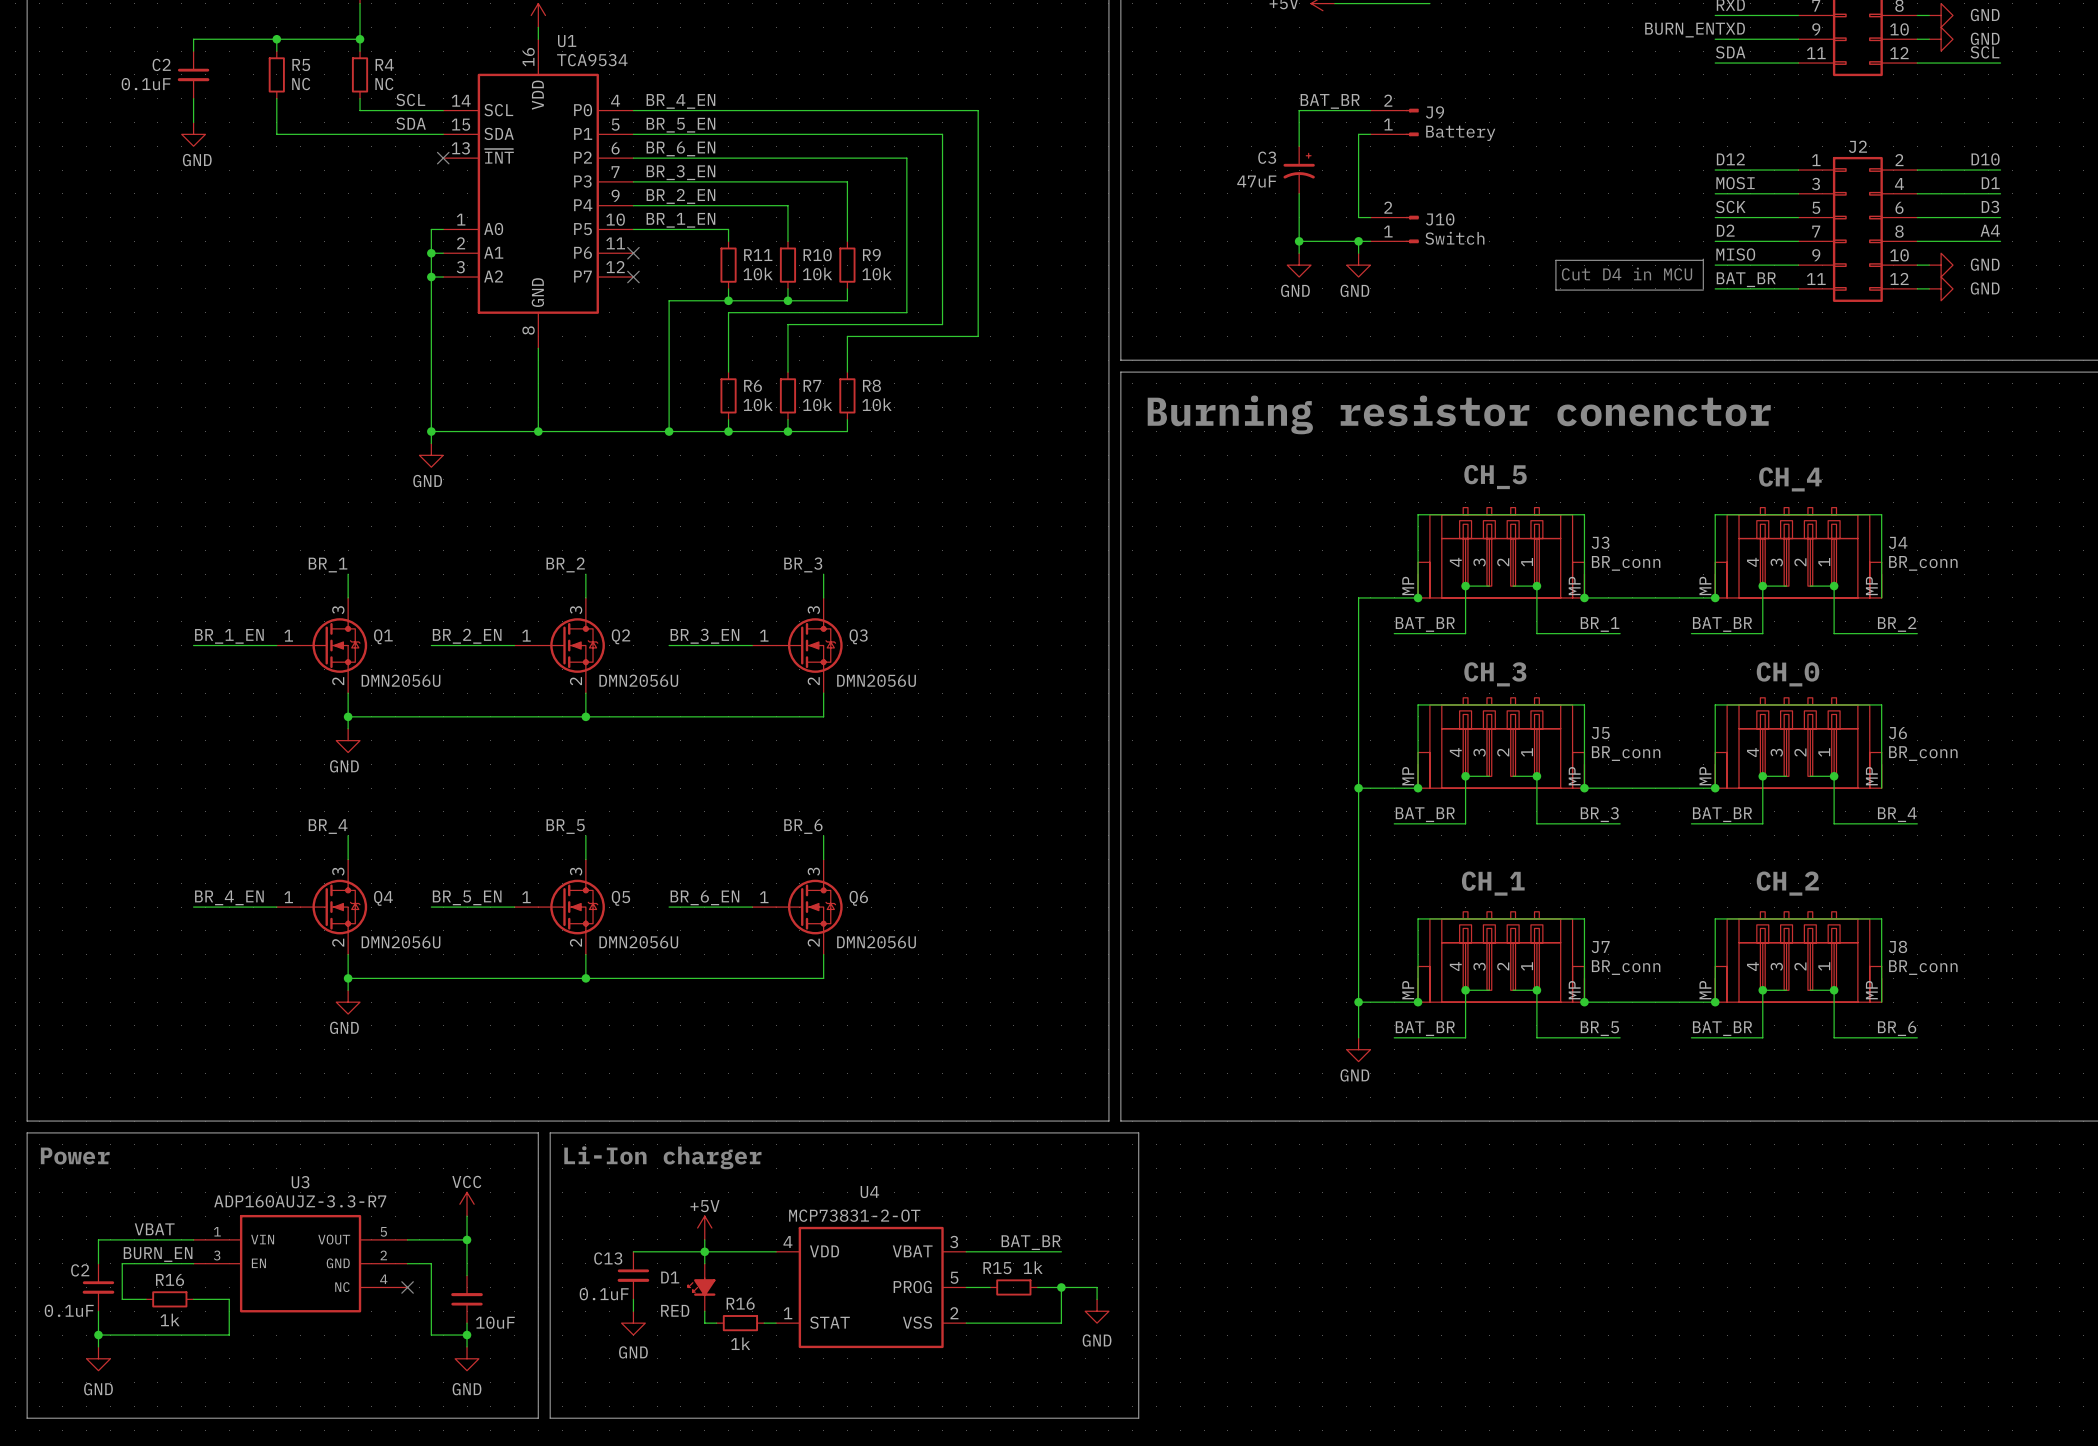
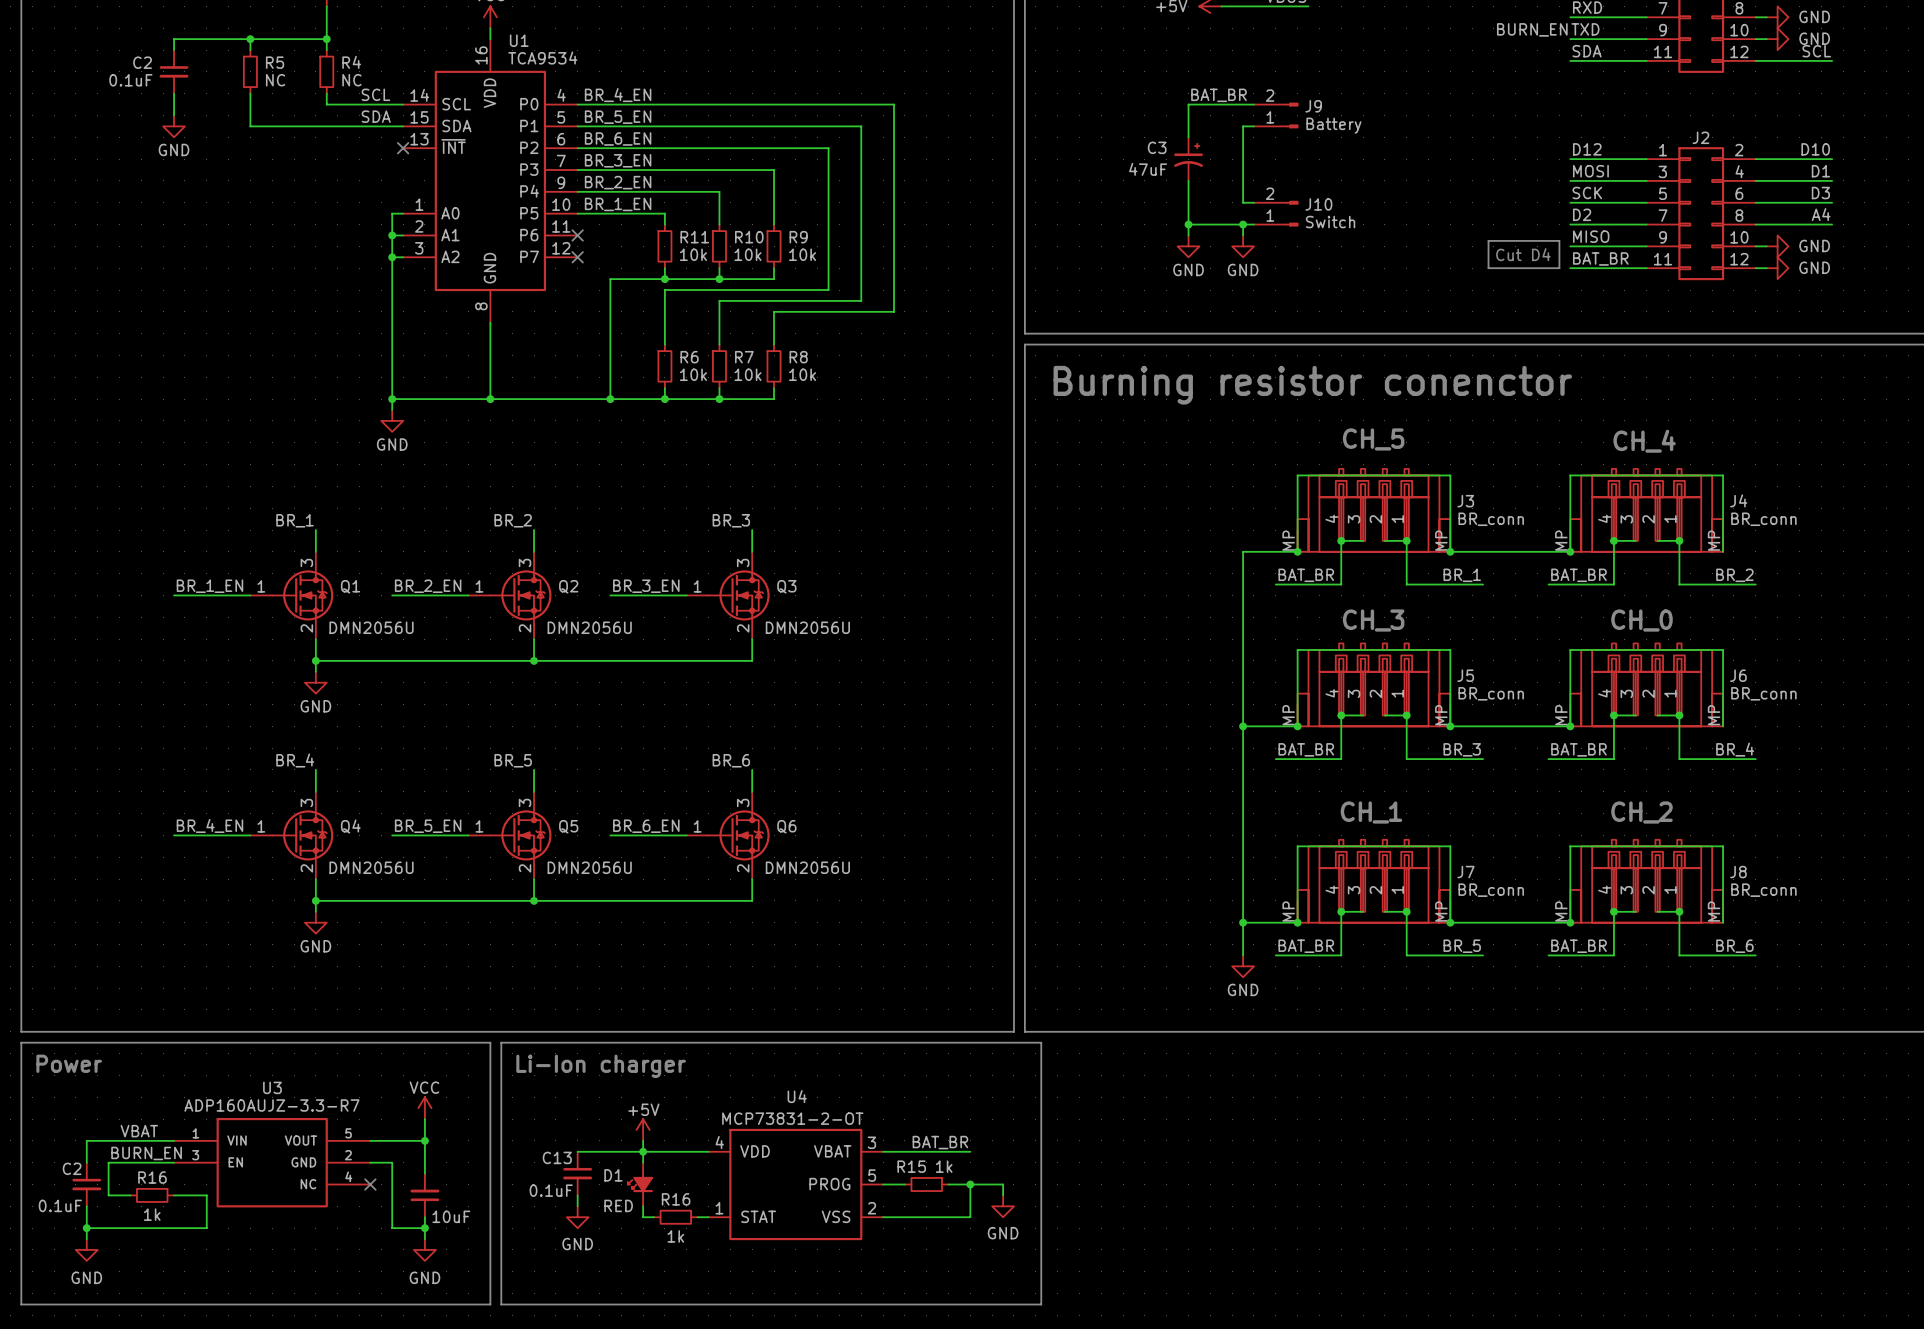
line: none -> (1559, 240) (1488, 240) (1488, 268) (1559, 268)
line: (1703, 260) (1555, 260) (1555, 290) (1703, 290) -> none
text: Cut D4 in MCU (1627, 274) -> Cut D4 (1523, 254)

